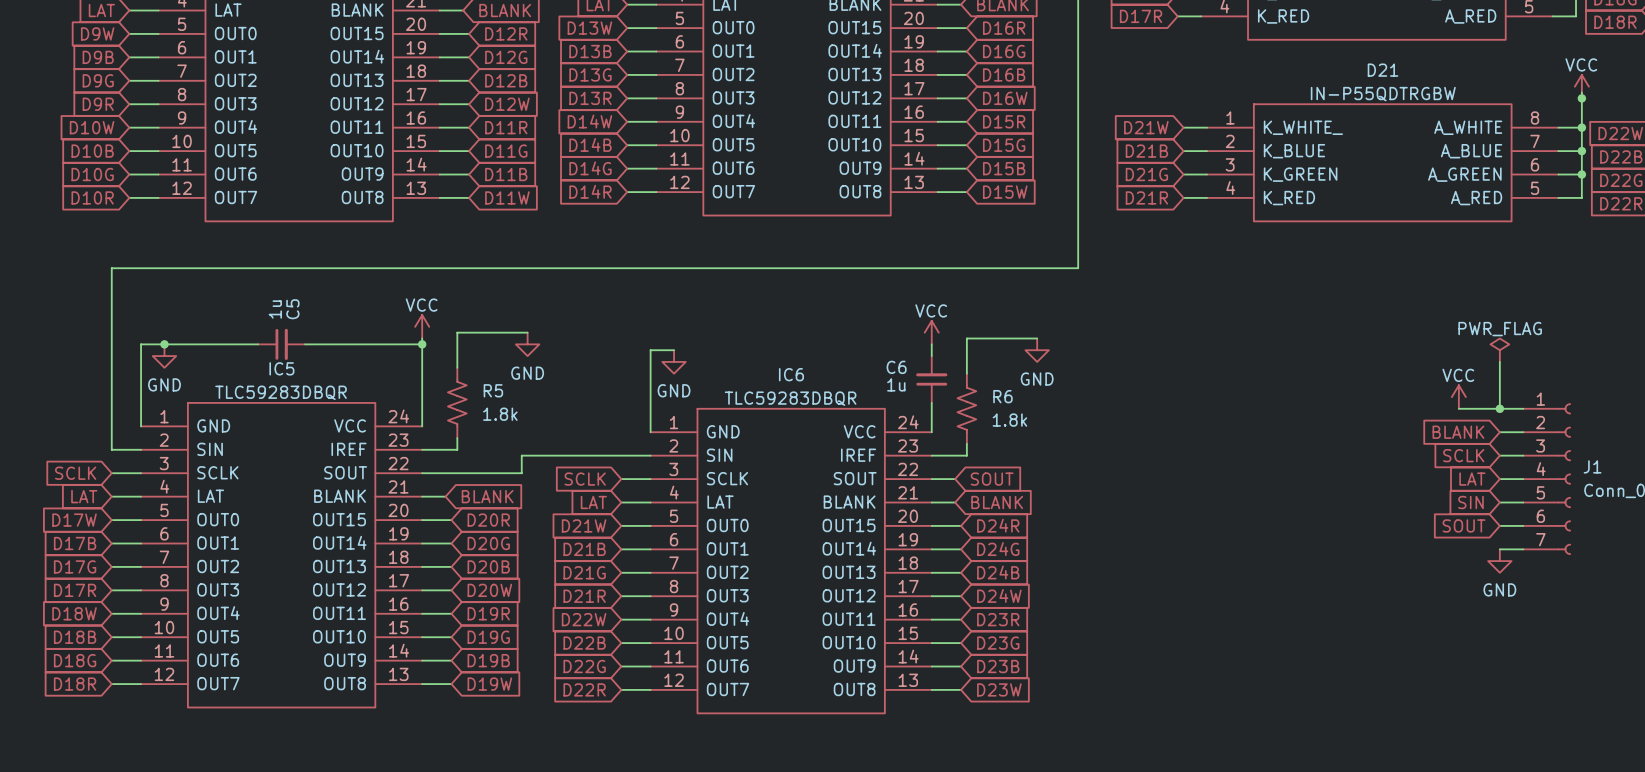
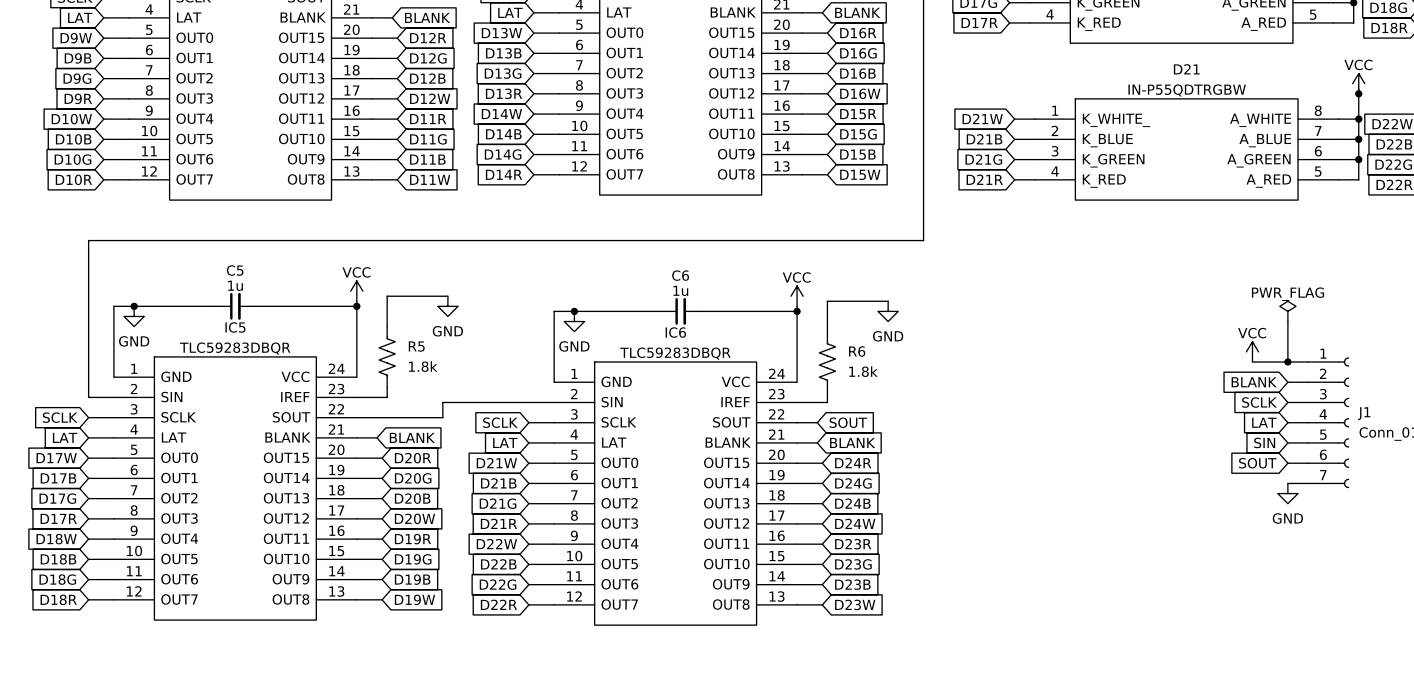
C5 value rotation: 0° (275, 309) -> 90° clockwise (235, 285)
C5 name rotation: 0° (292, 309) -> 90° clockwise (235, 270)
wire: none -> (574, 311) (660, 311)
junction: none -> (574, 311)
wire: none -> (700, 311) (797, 311)
junction: none -> (797, 311)
C6 rotation: 0° (931, 379) -> 90° clockwise (680, 311)
C6 position: (931, 379) -> (680, 311)

